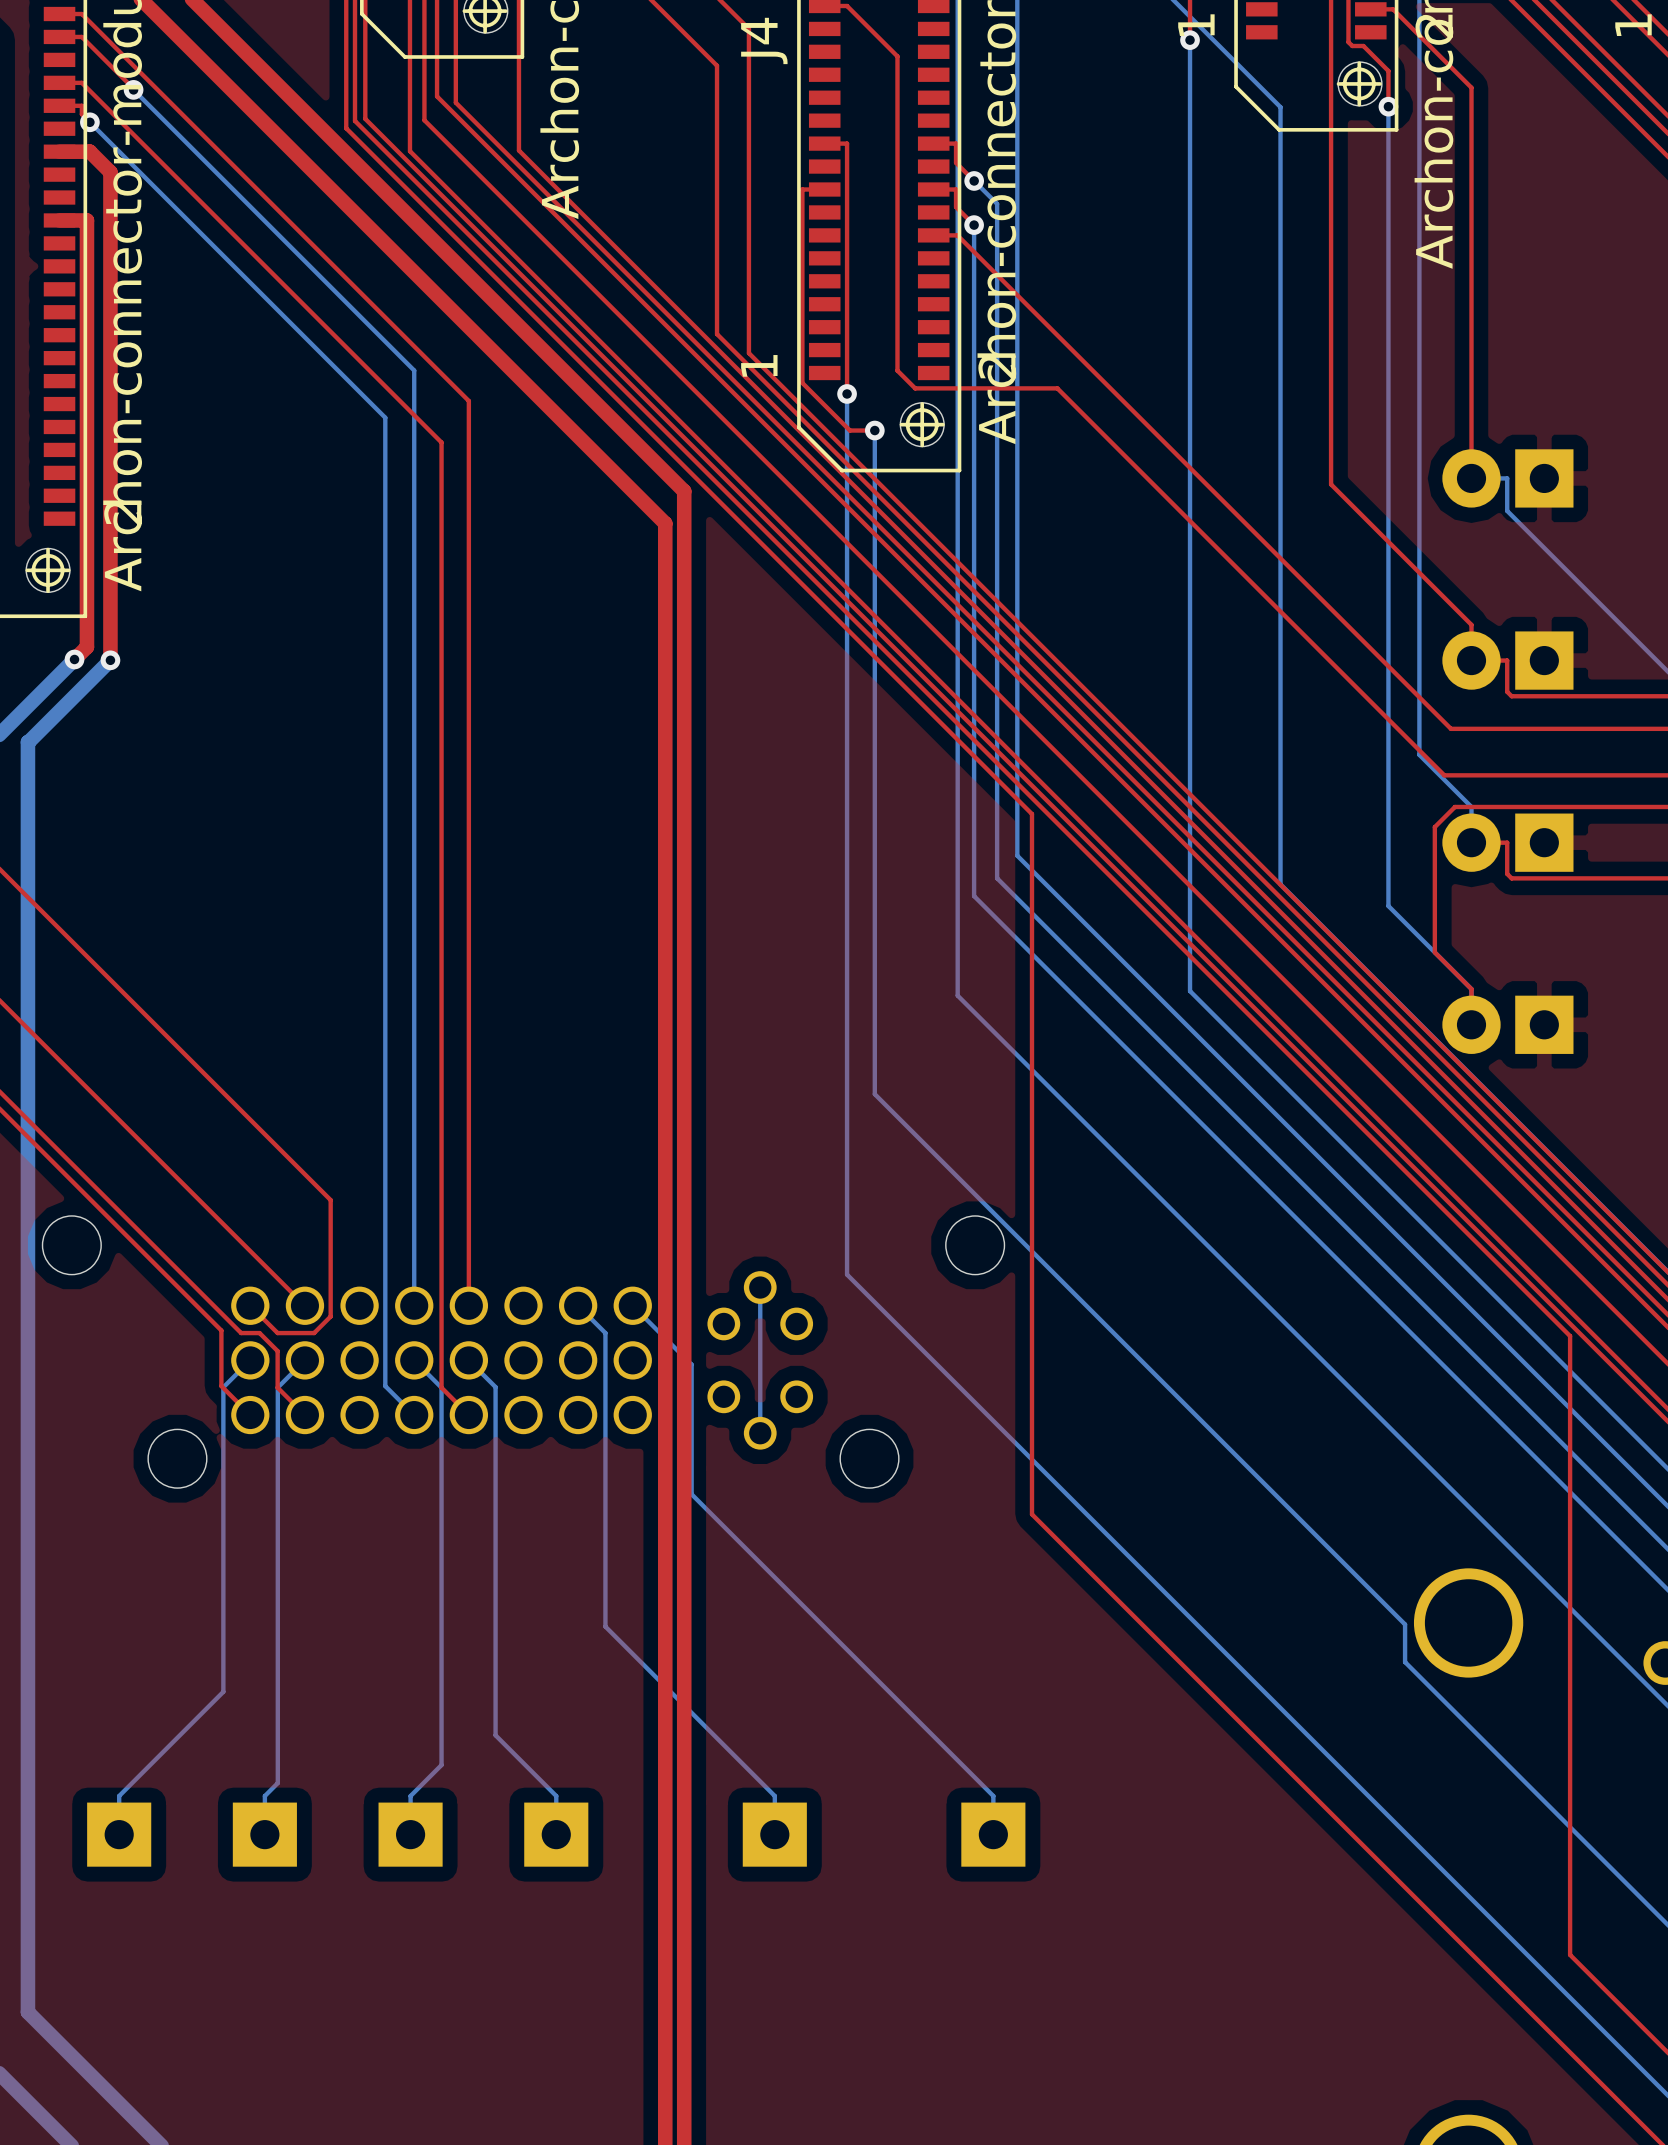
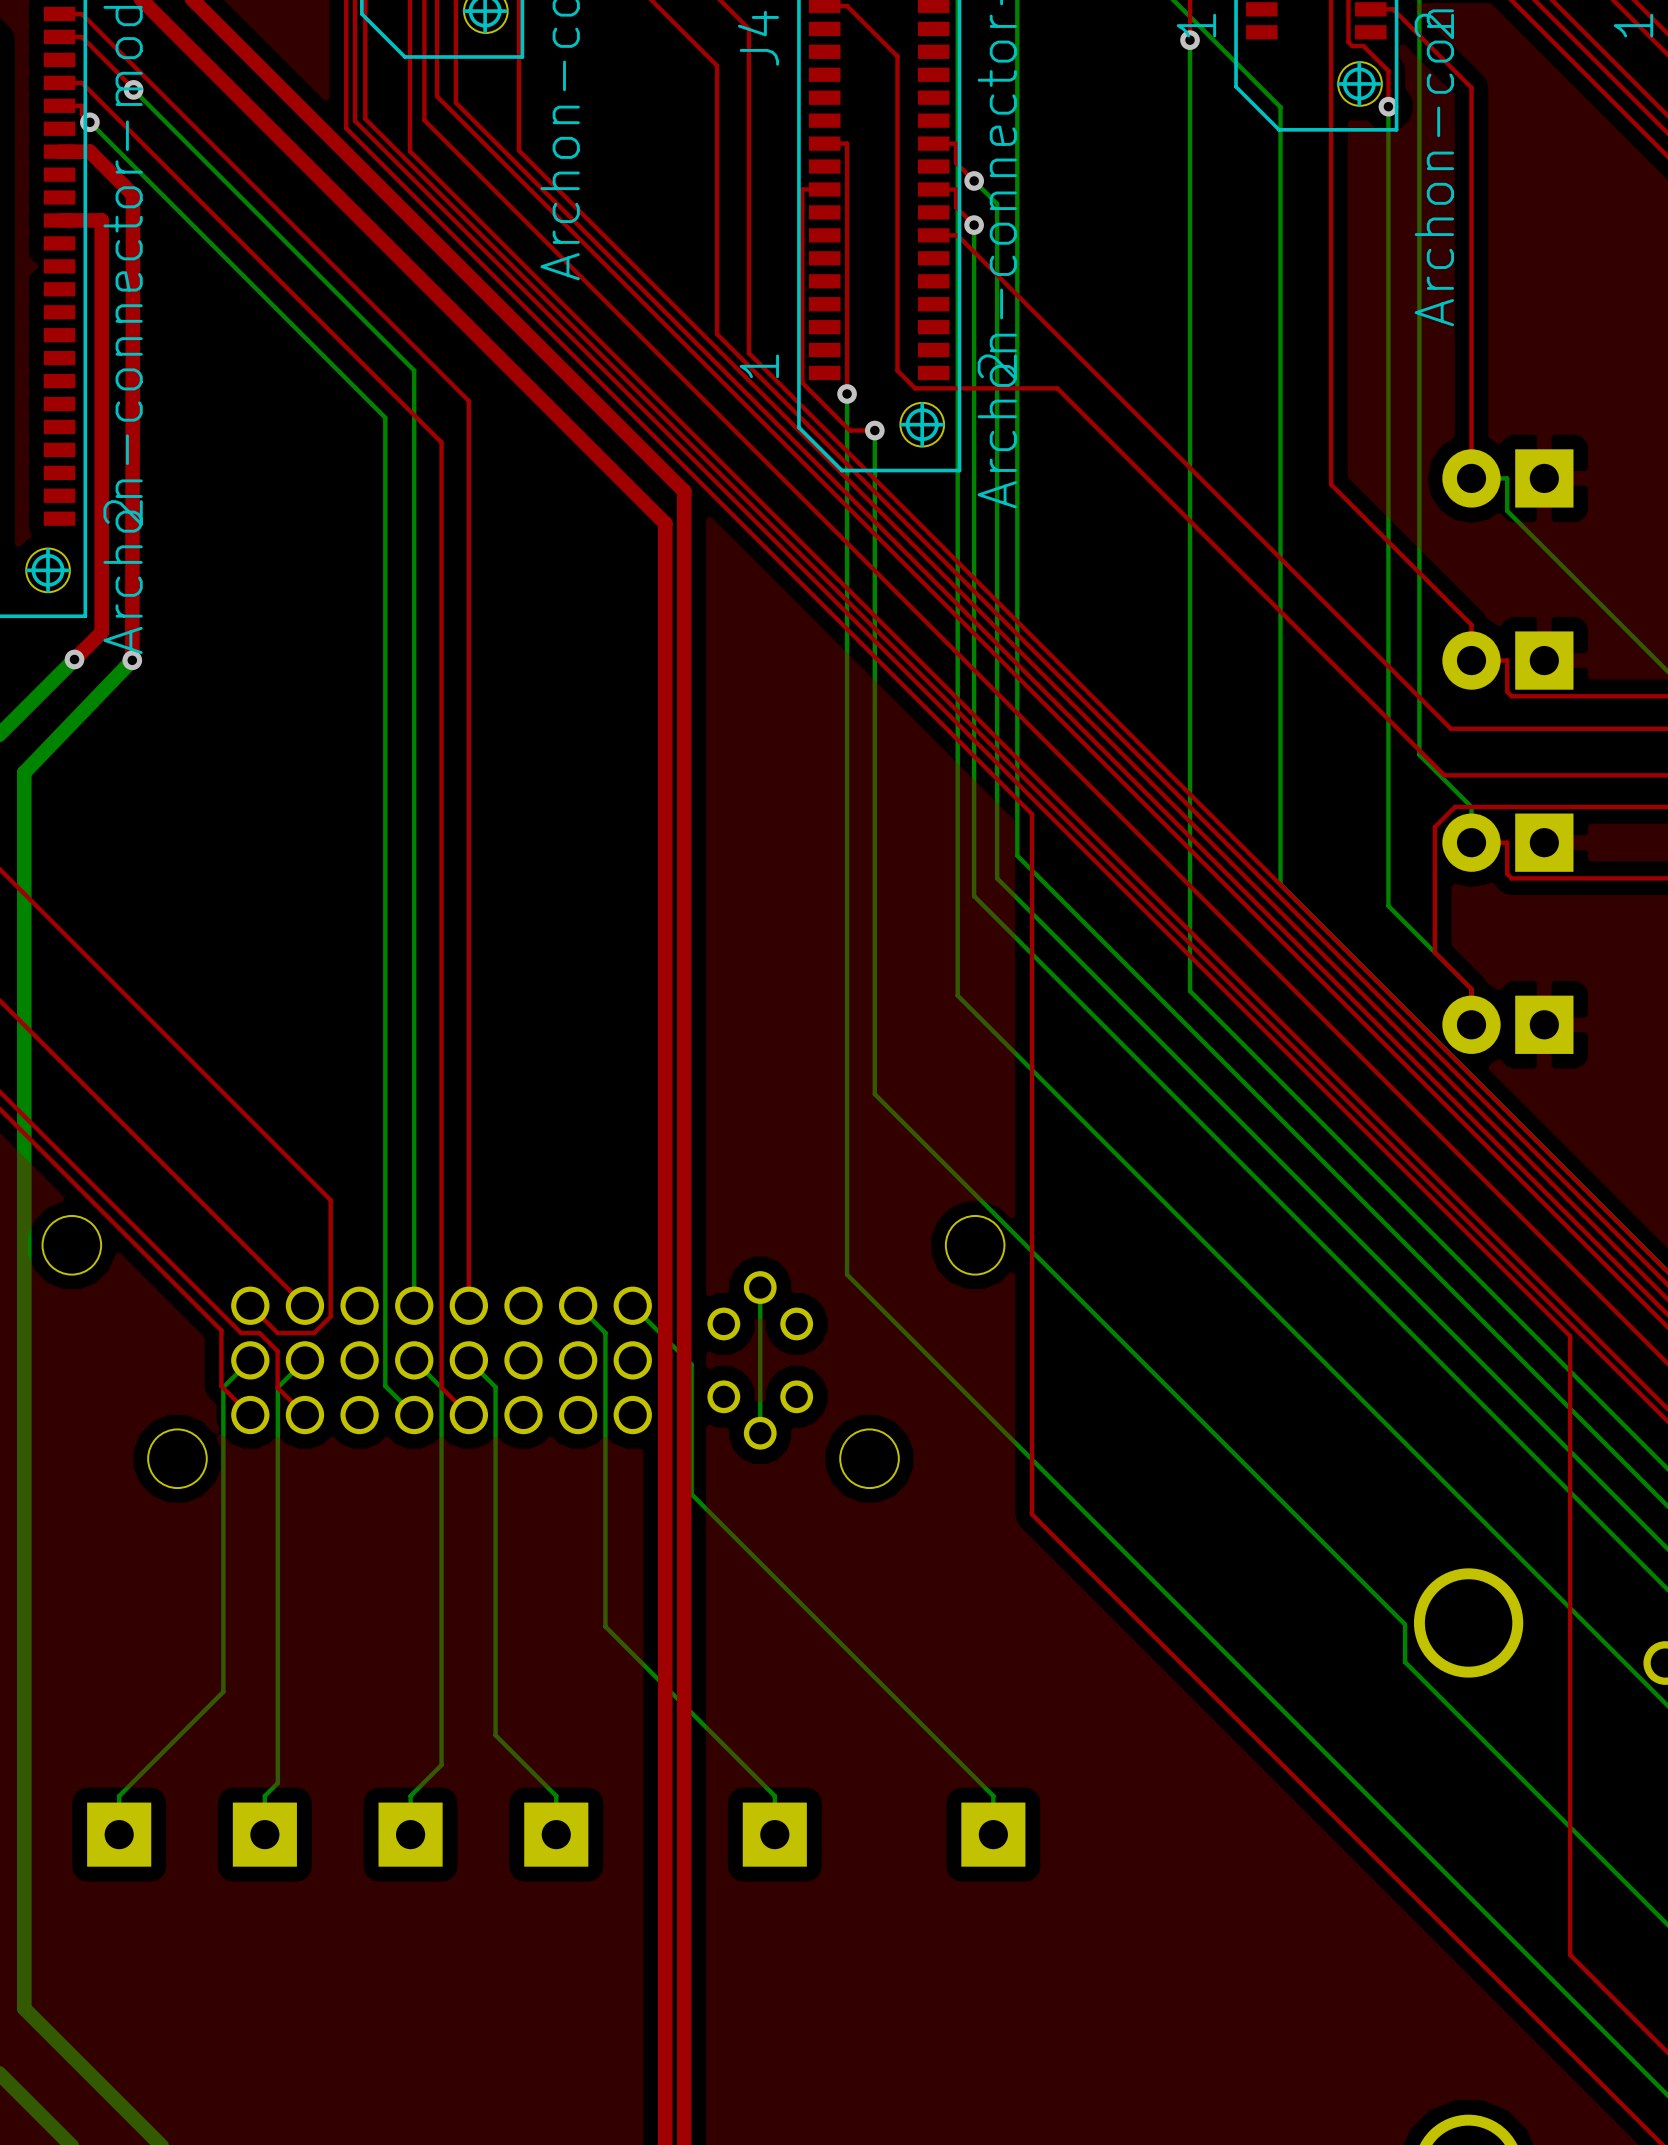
top track: (90, 151) (110, 172) (110, 660) -> (89, 151) (133, 194) (132, 660)
top track: (86, 220) (86, 647) -> (86, 220) (101, 220) (101, 632) (86, 647)
bottom track: (110, 660) (27, 742) (27, 2012) -> (24, 772) (24, 2008) (27, 2012)
via position: (110, 660) -> (132, 660)
bottom track: none -> (132, 660) (24, 772)

